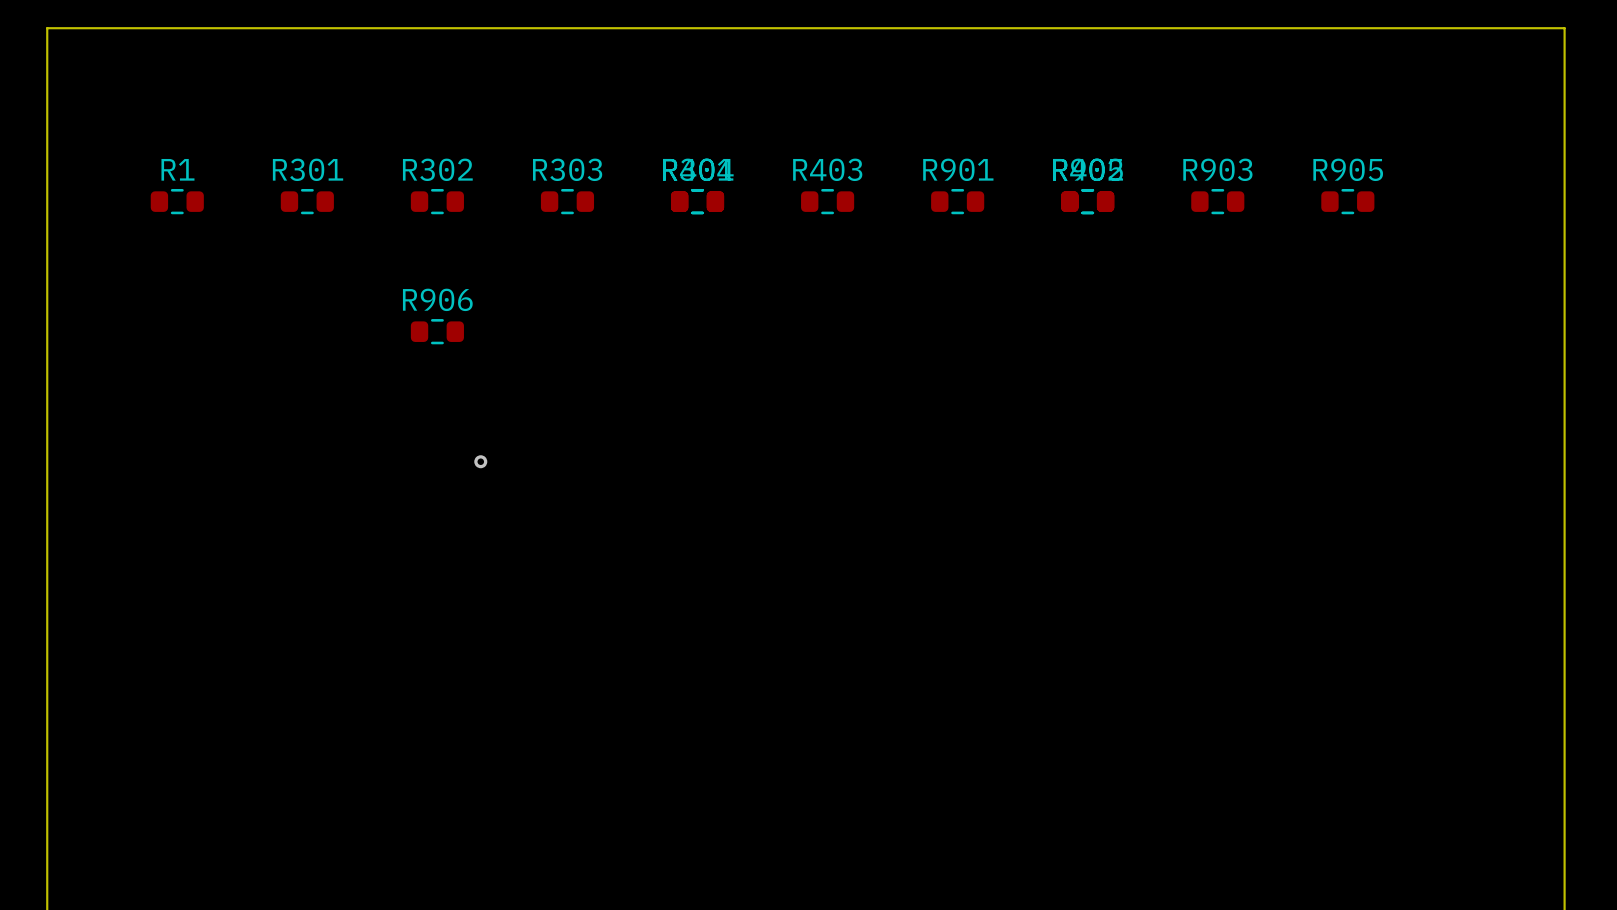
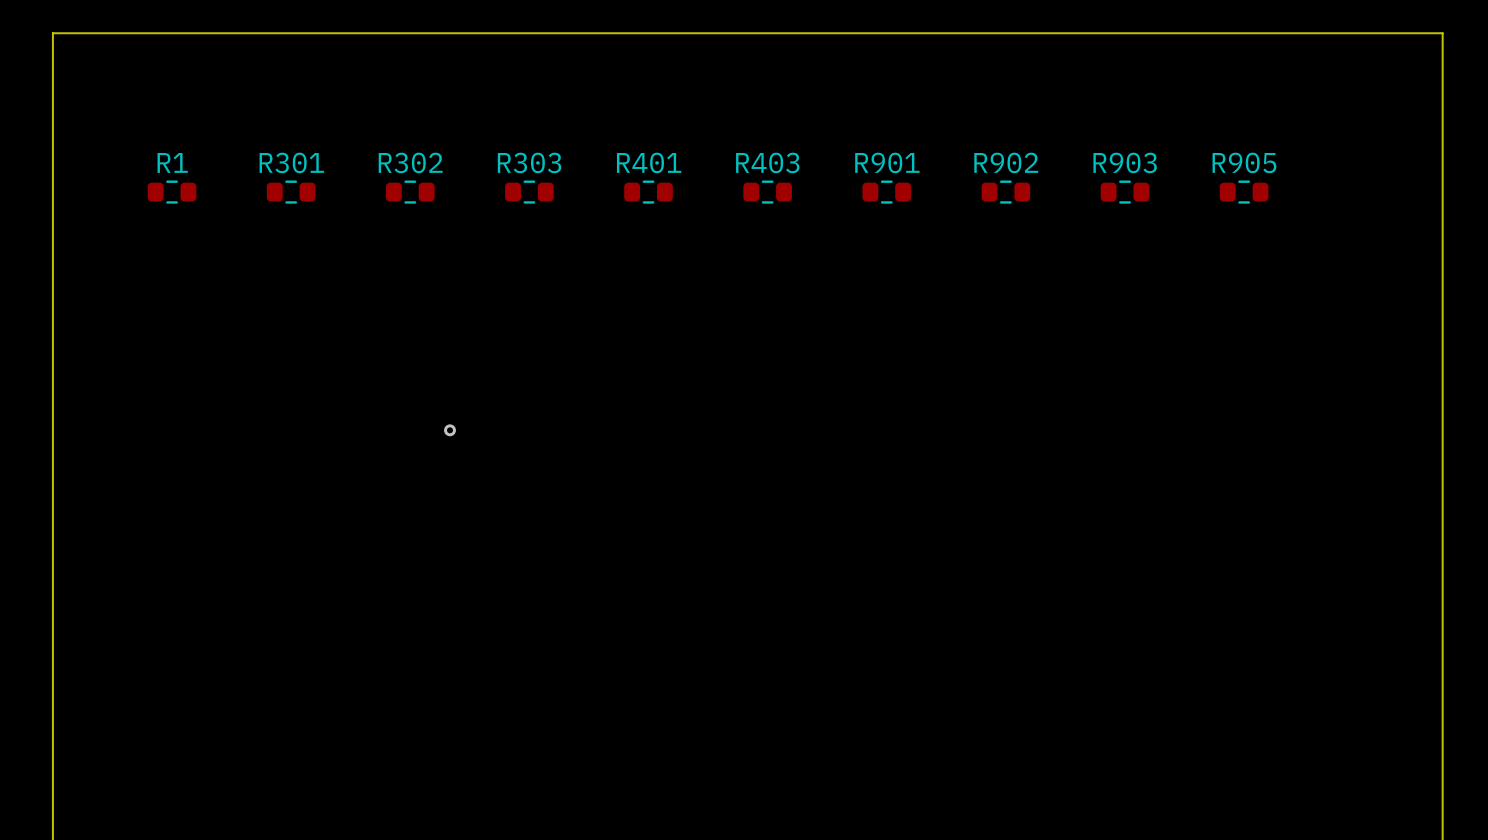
part: (697, 201) -> none
part: (1087, 201) -> none
R906: (437, 331) -> none

